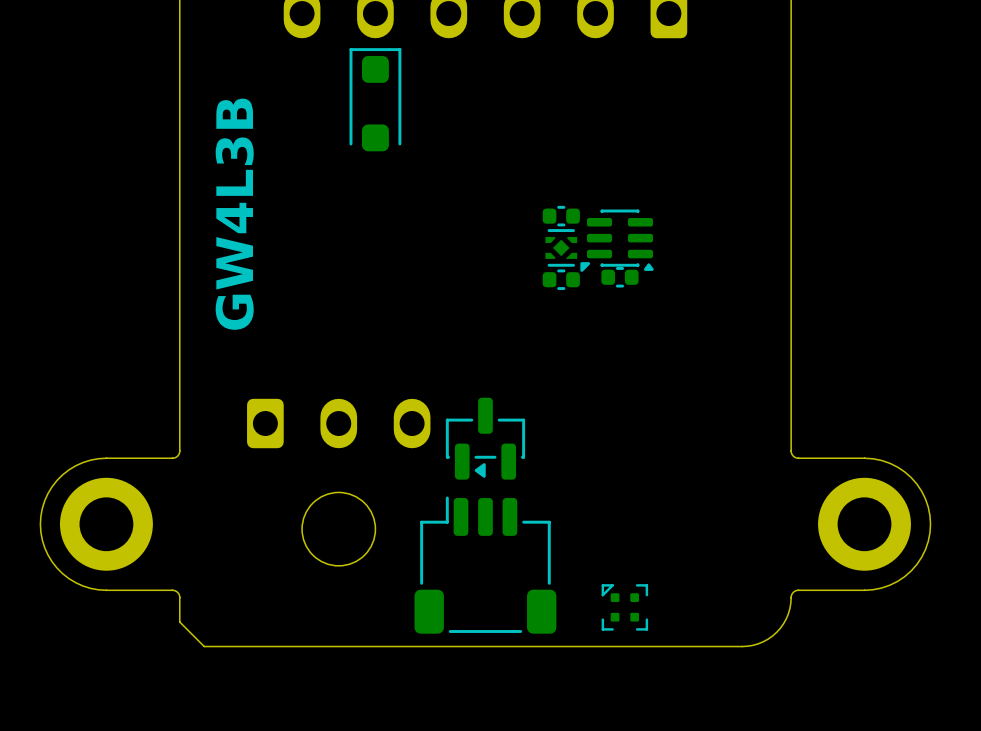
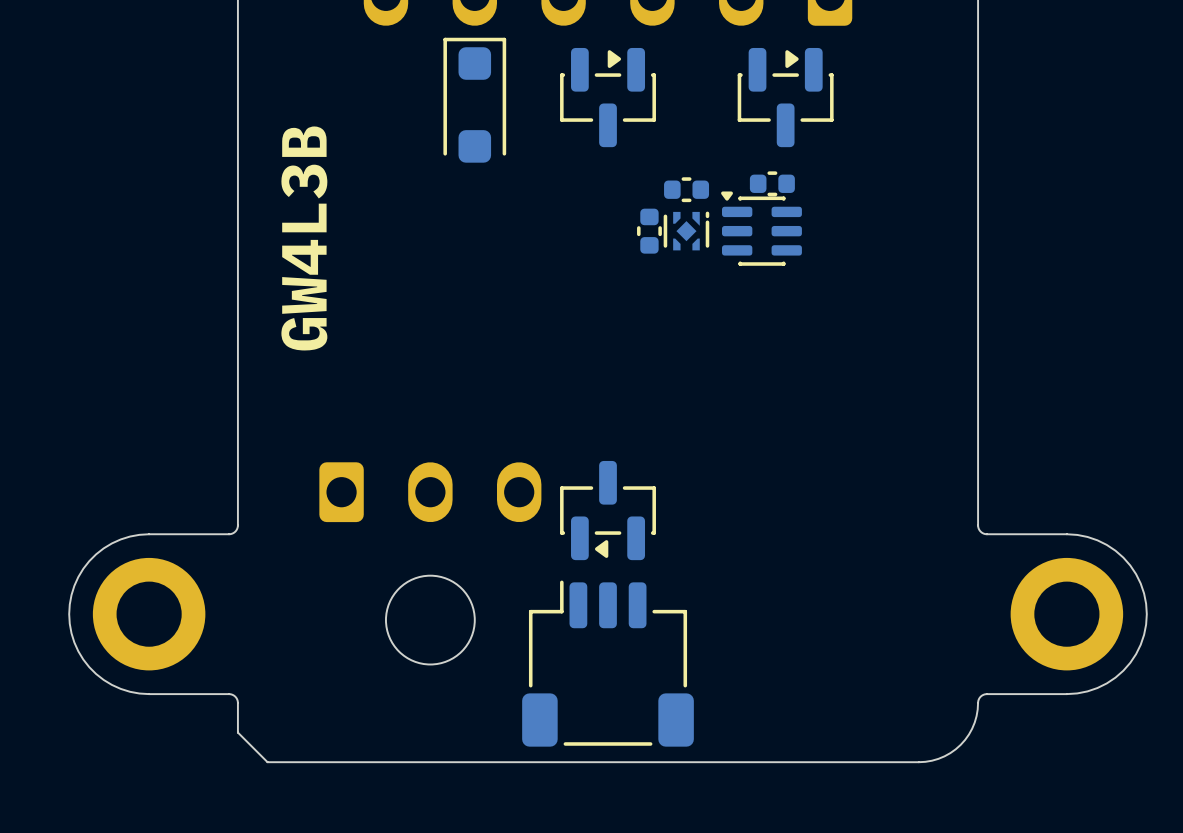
part: none -> (608, 97)
part: none -> (785, 97)
part: none -> (772, 183)
part: none -> (686, 189)
part footprint: [542, 205, 580, 227] -> [663, 211, 710, 251]
part: none -> (649, 231)
part rotation: 0° (620, 240) -> 180° (761, 228)
part: (567, 250) -> none
part: (619, 277) -> none
part: (561, 279) -> none
part: (624, 607) -> none

